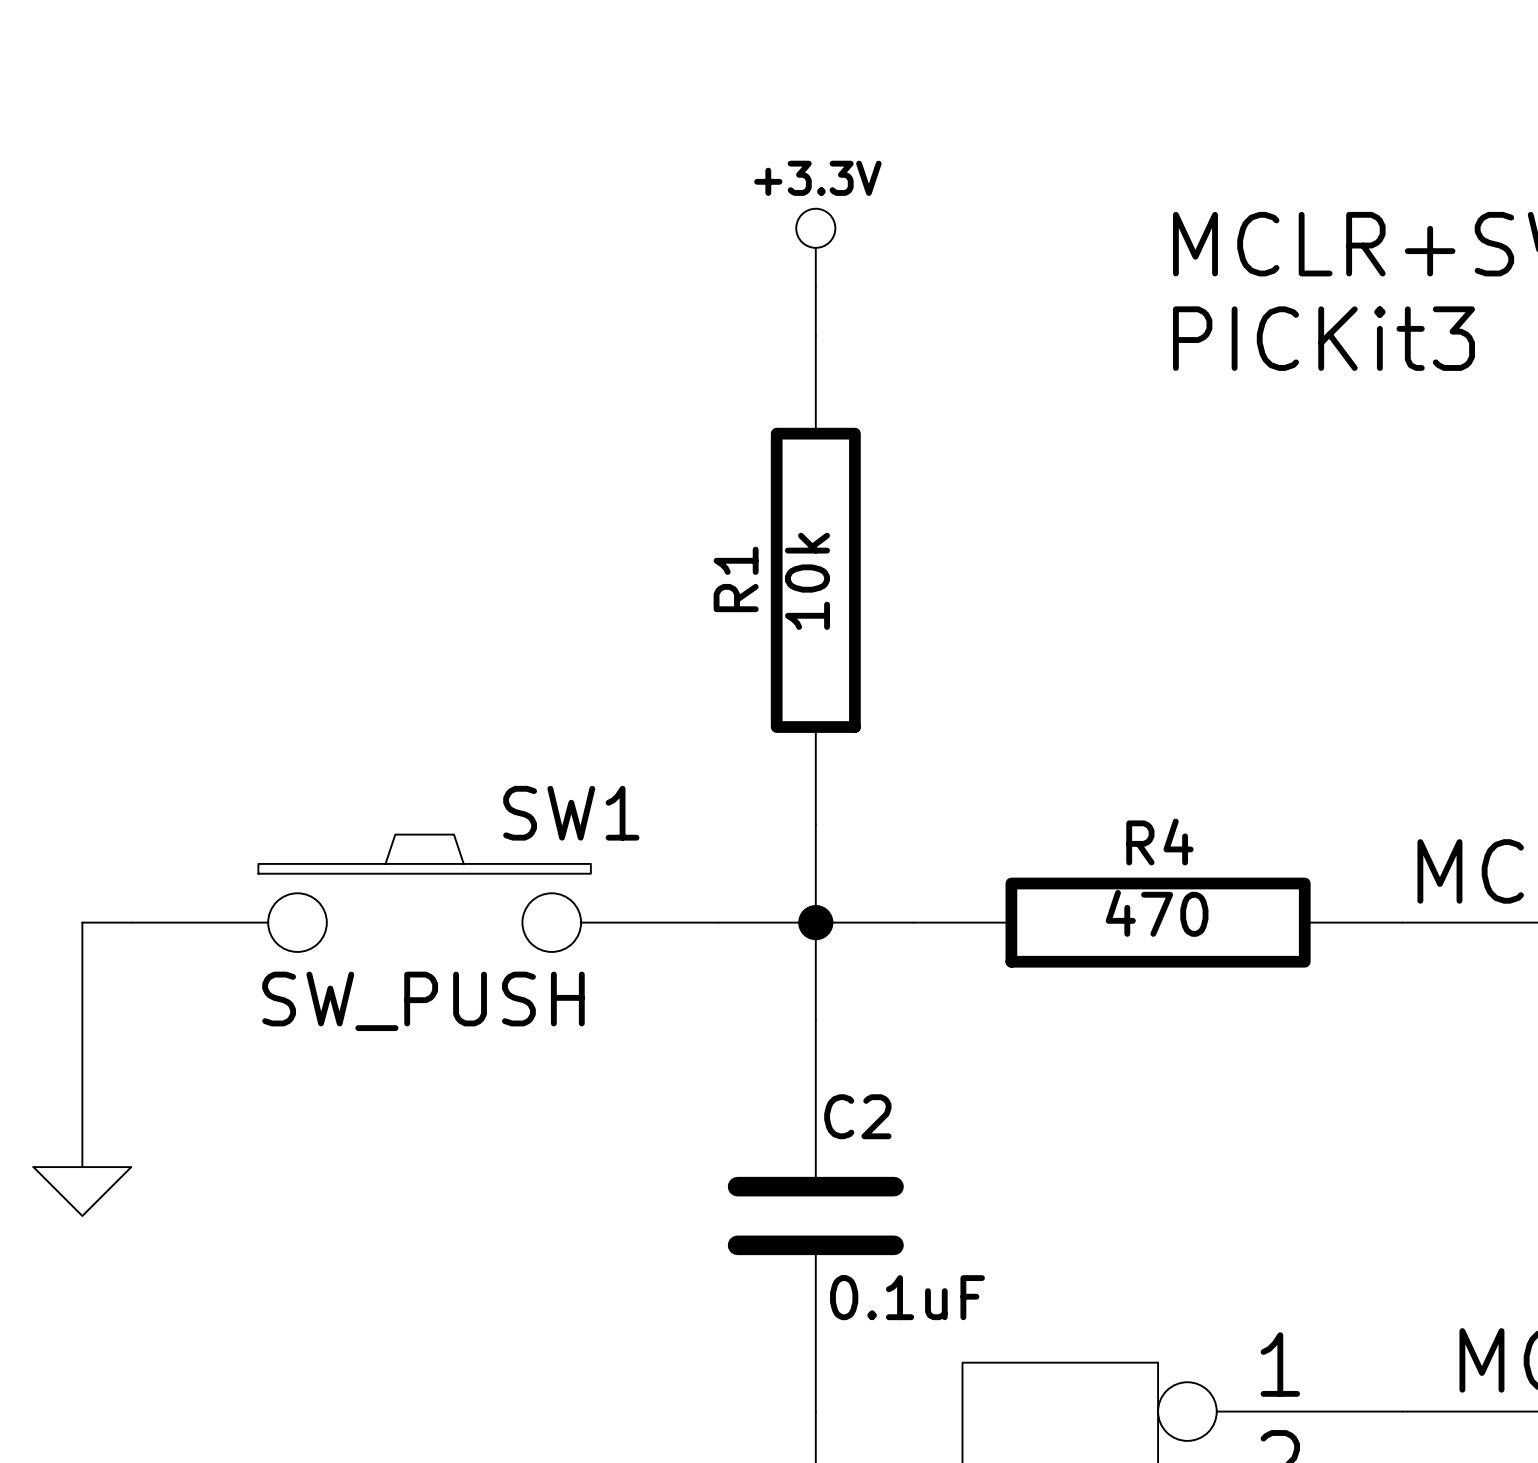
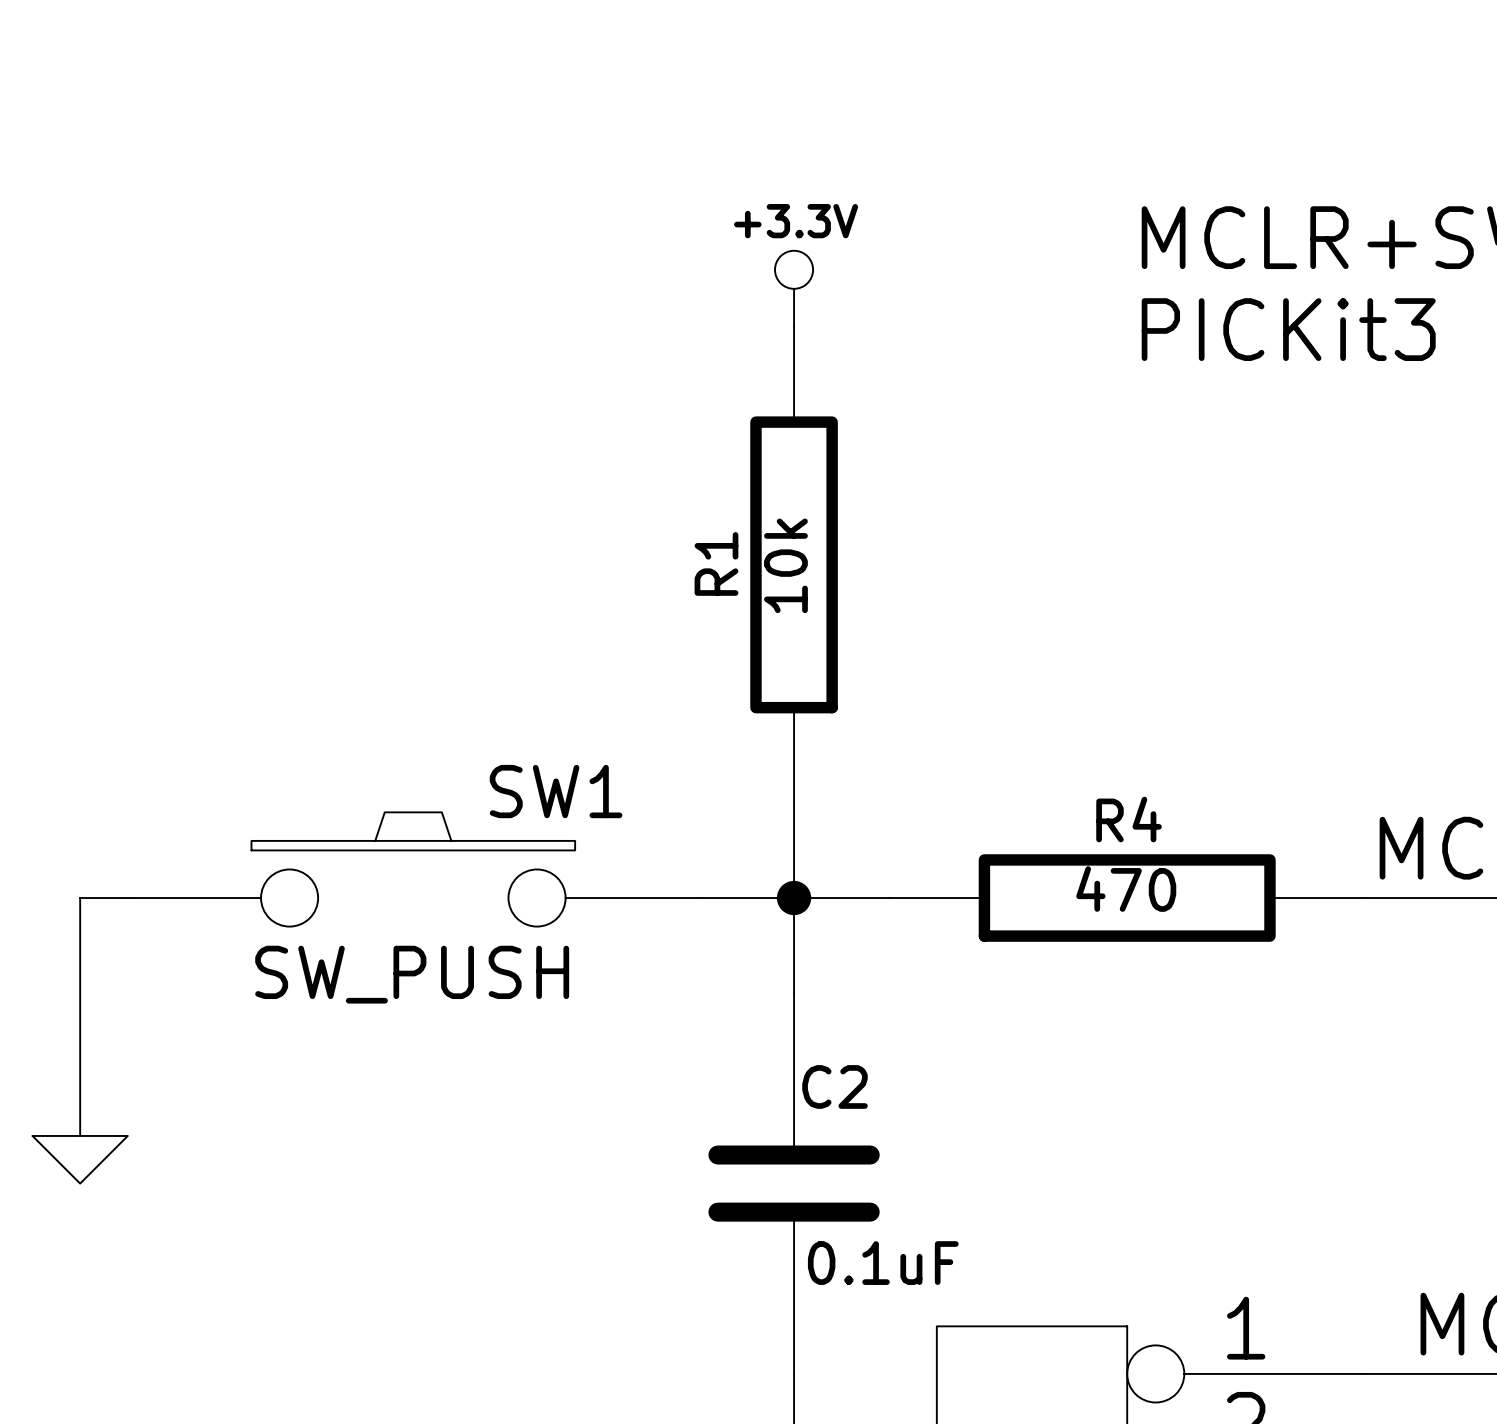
power symbol position: +3.3V (815, 247) -> +3.3V (794, 288)

